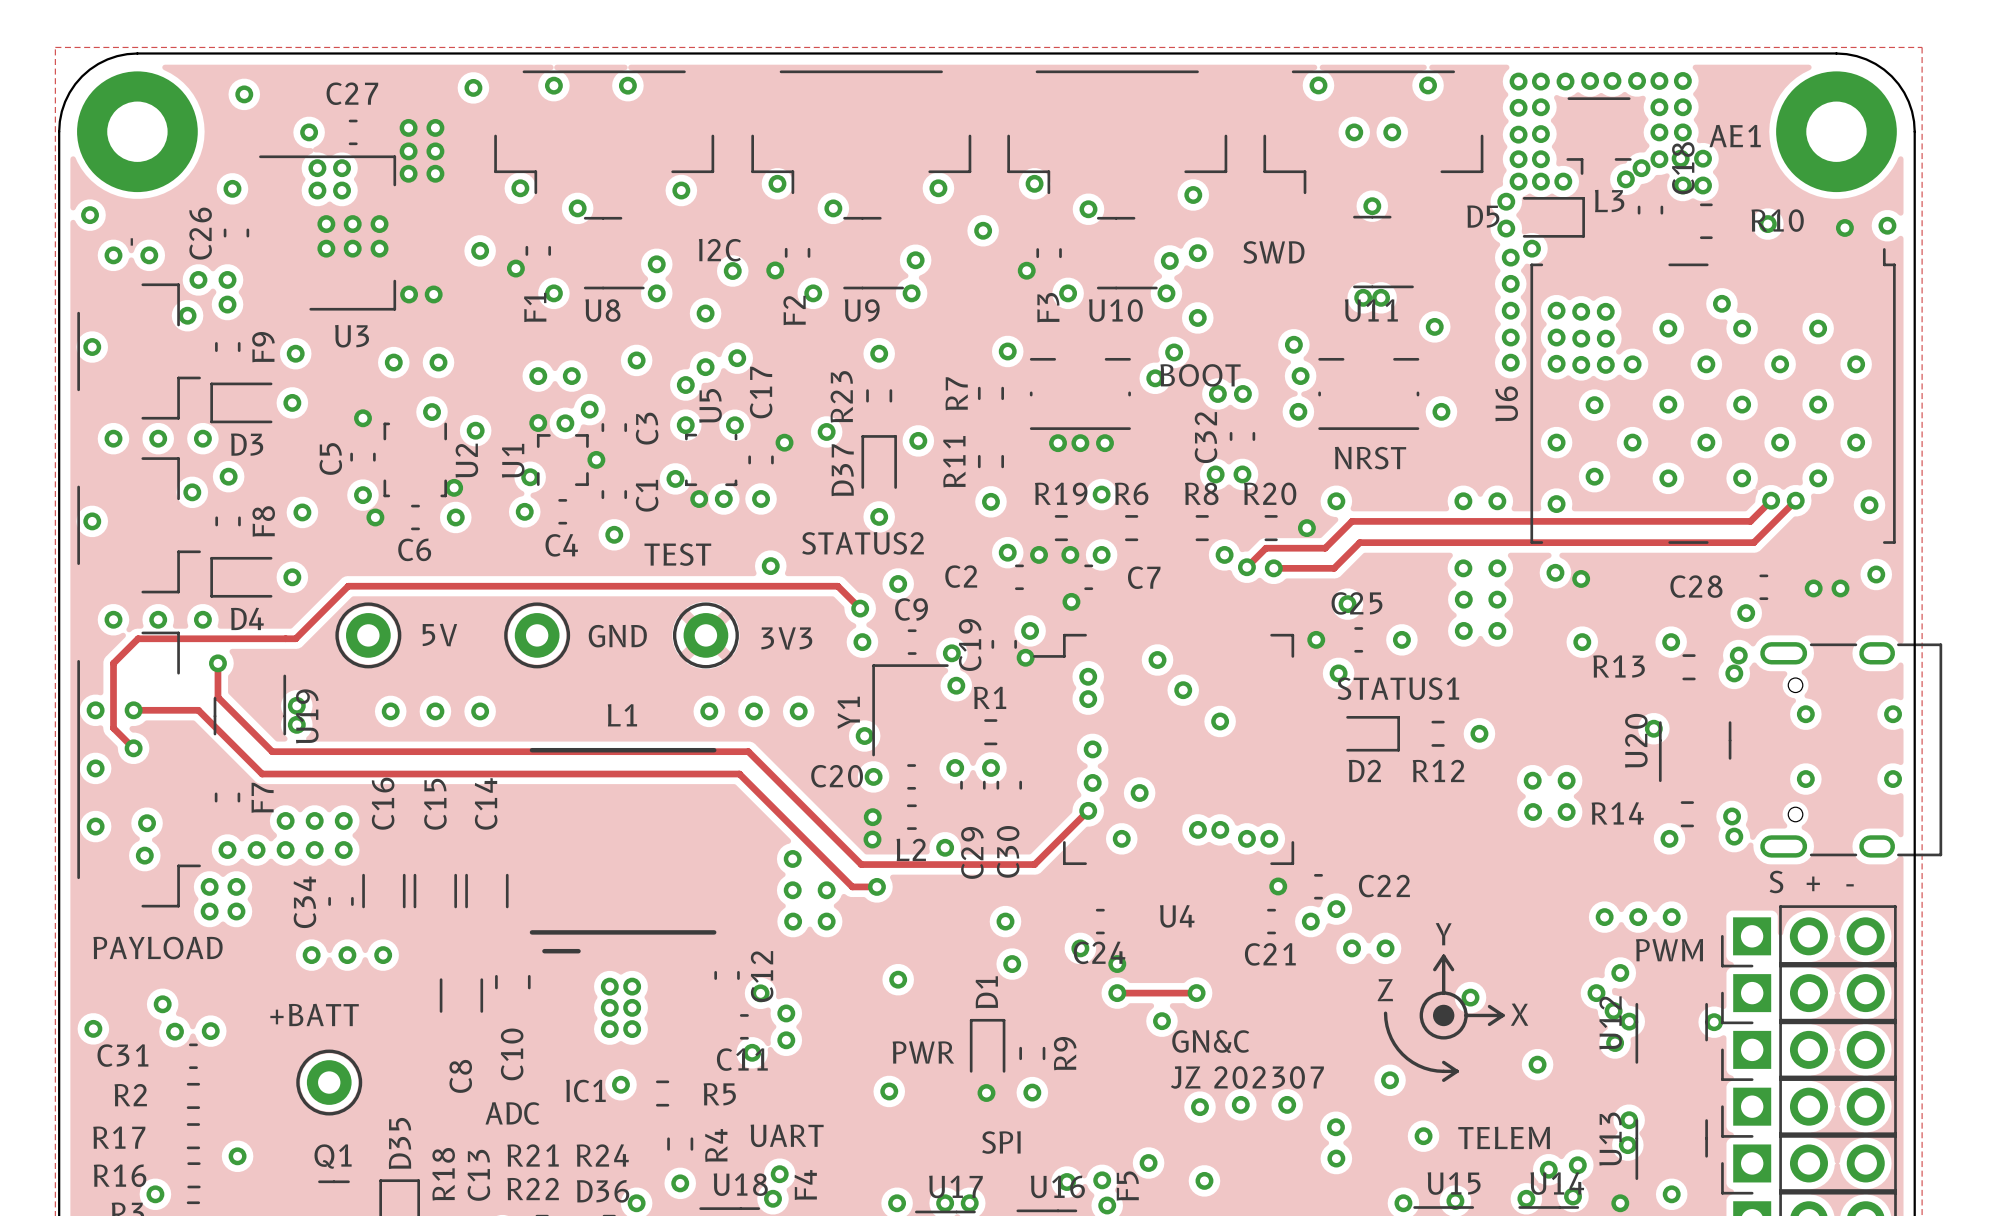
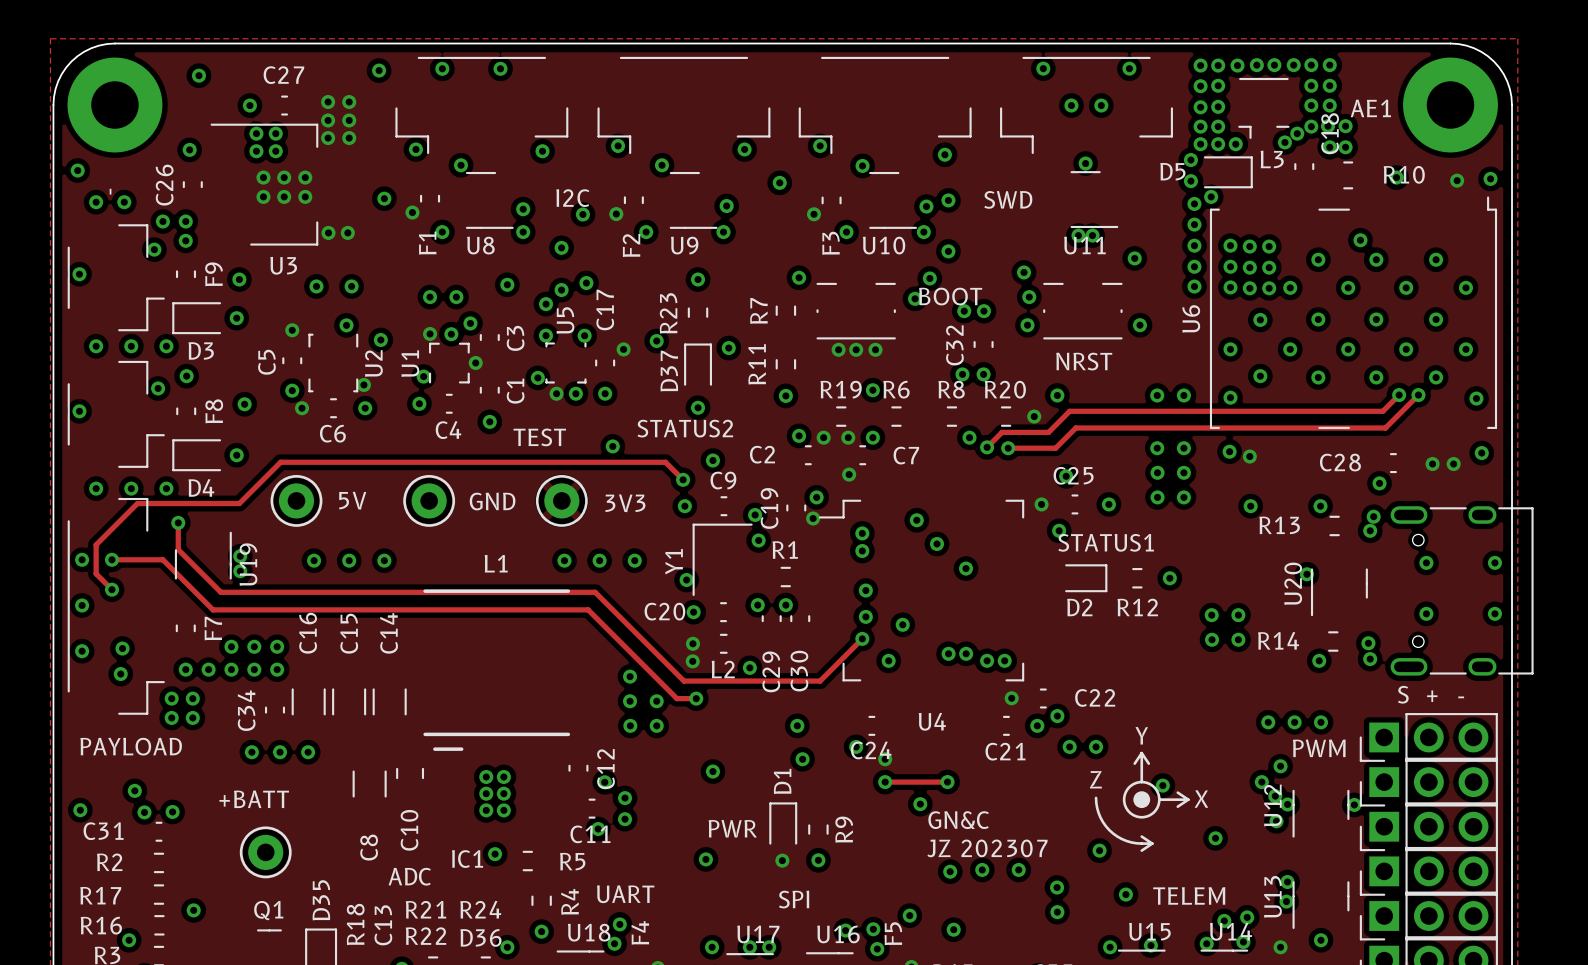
track: (166, 638) (138, 638) (113, 663) (113, 691) -> (137, 503) (96, 544)

